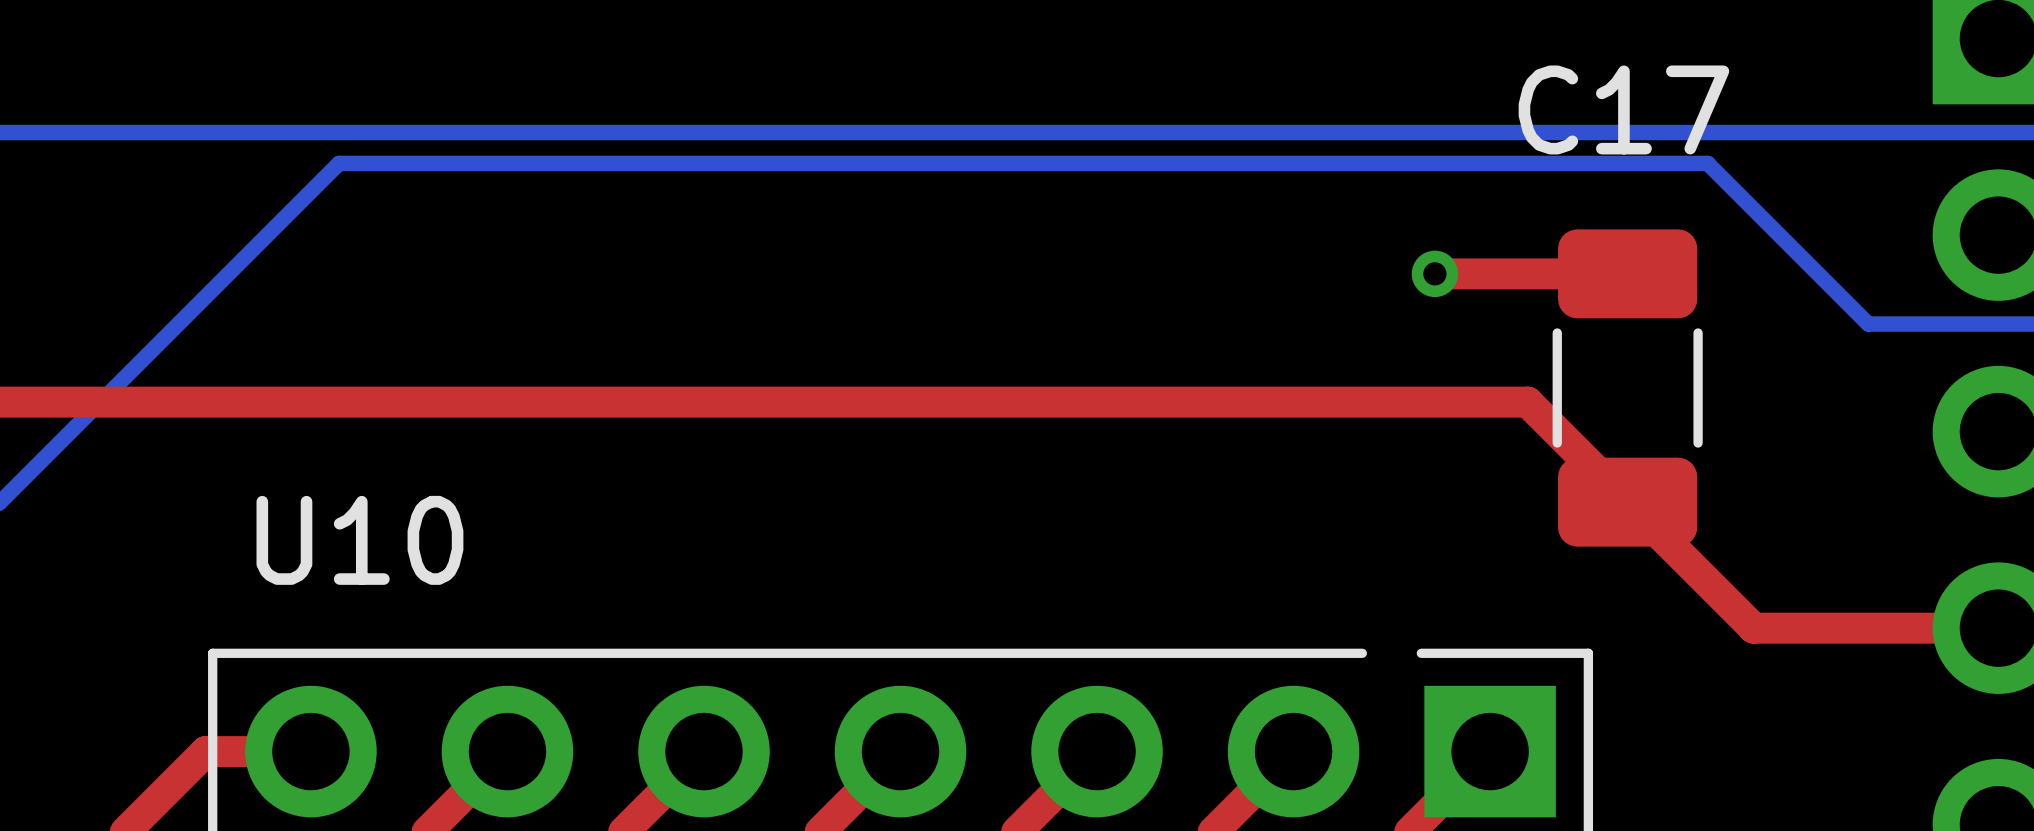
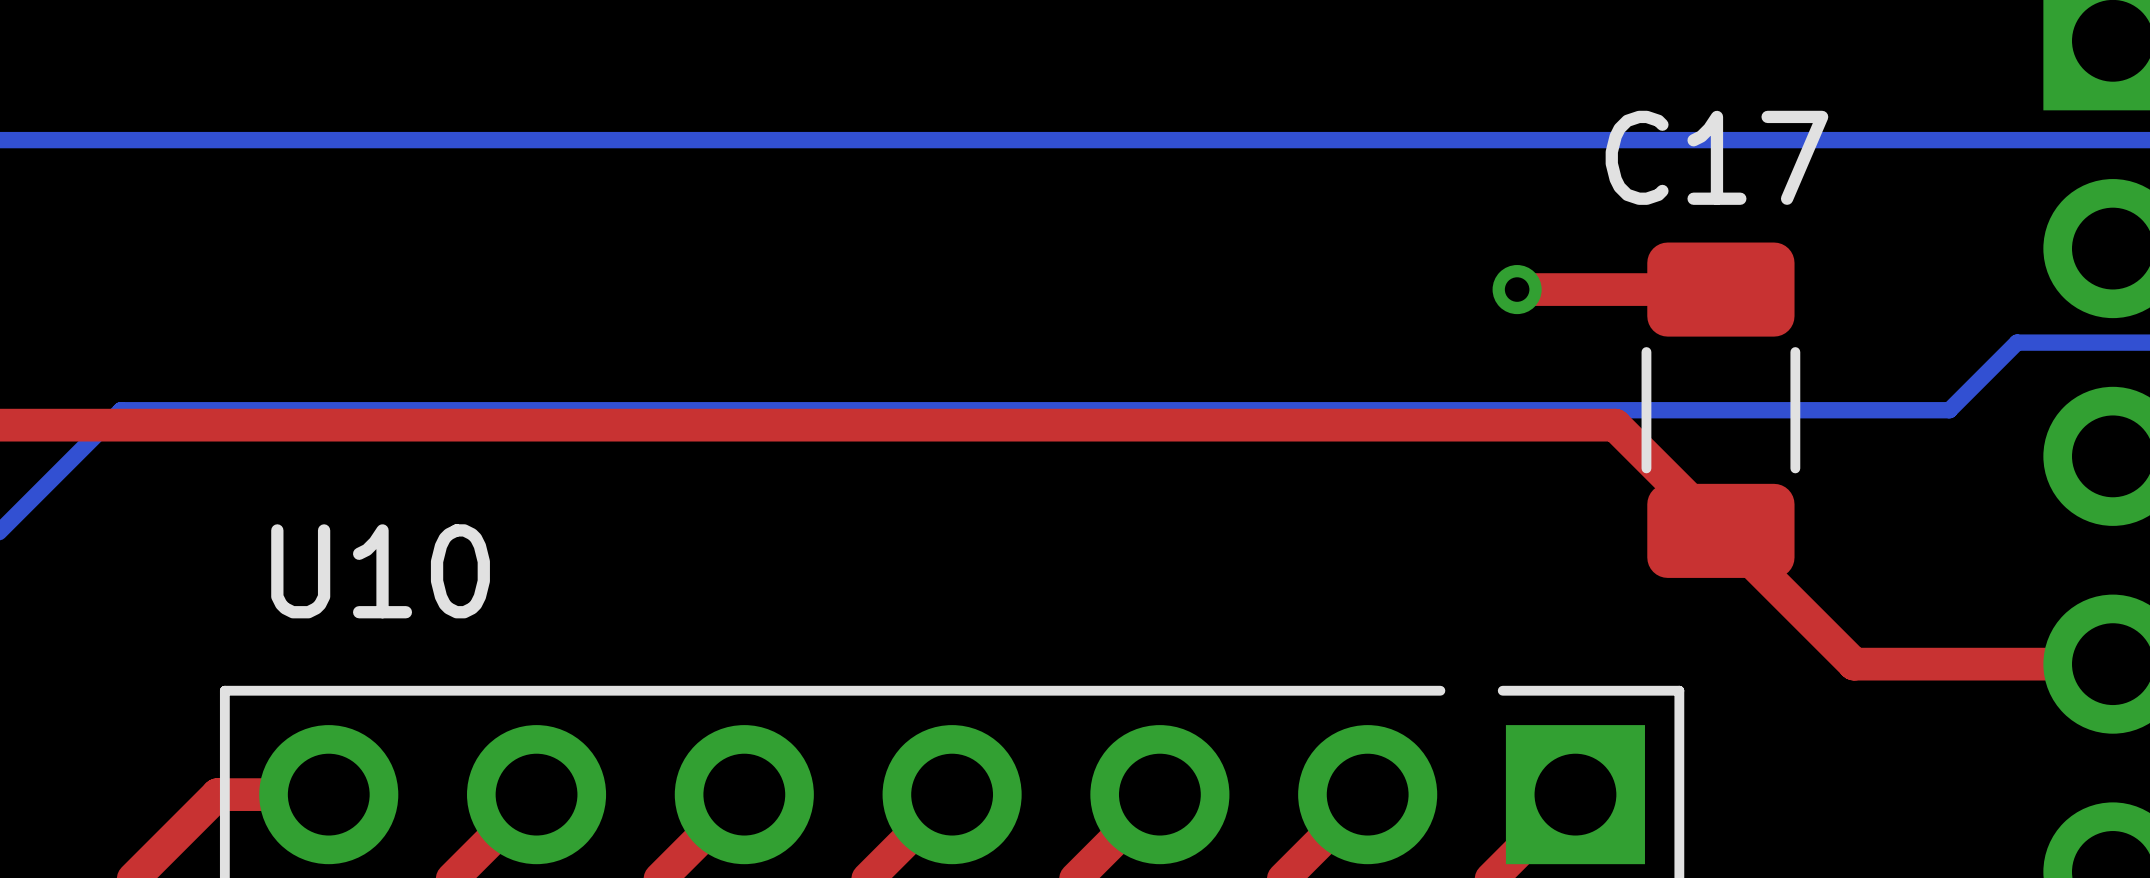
C17 name position: C17 (1623, 109) -> C17 (1716, 157)
bottom track: (1907, 324) (1868, 324) (1707, 163) (338, 163) (114, 388) -> (2017, 342) (1949, 410) (120, 410)

